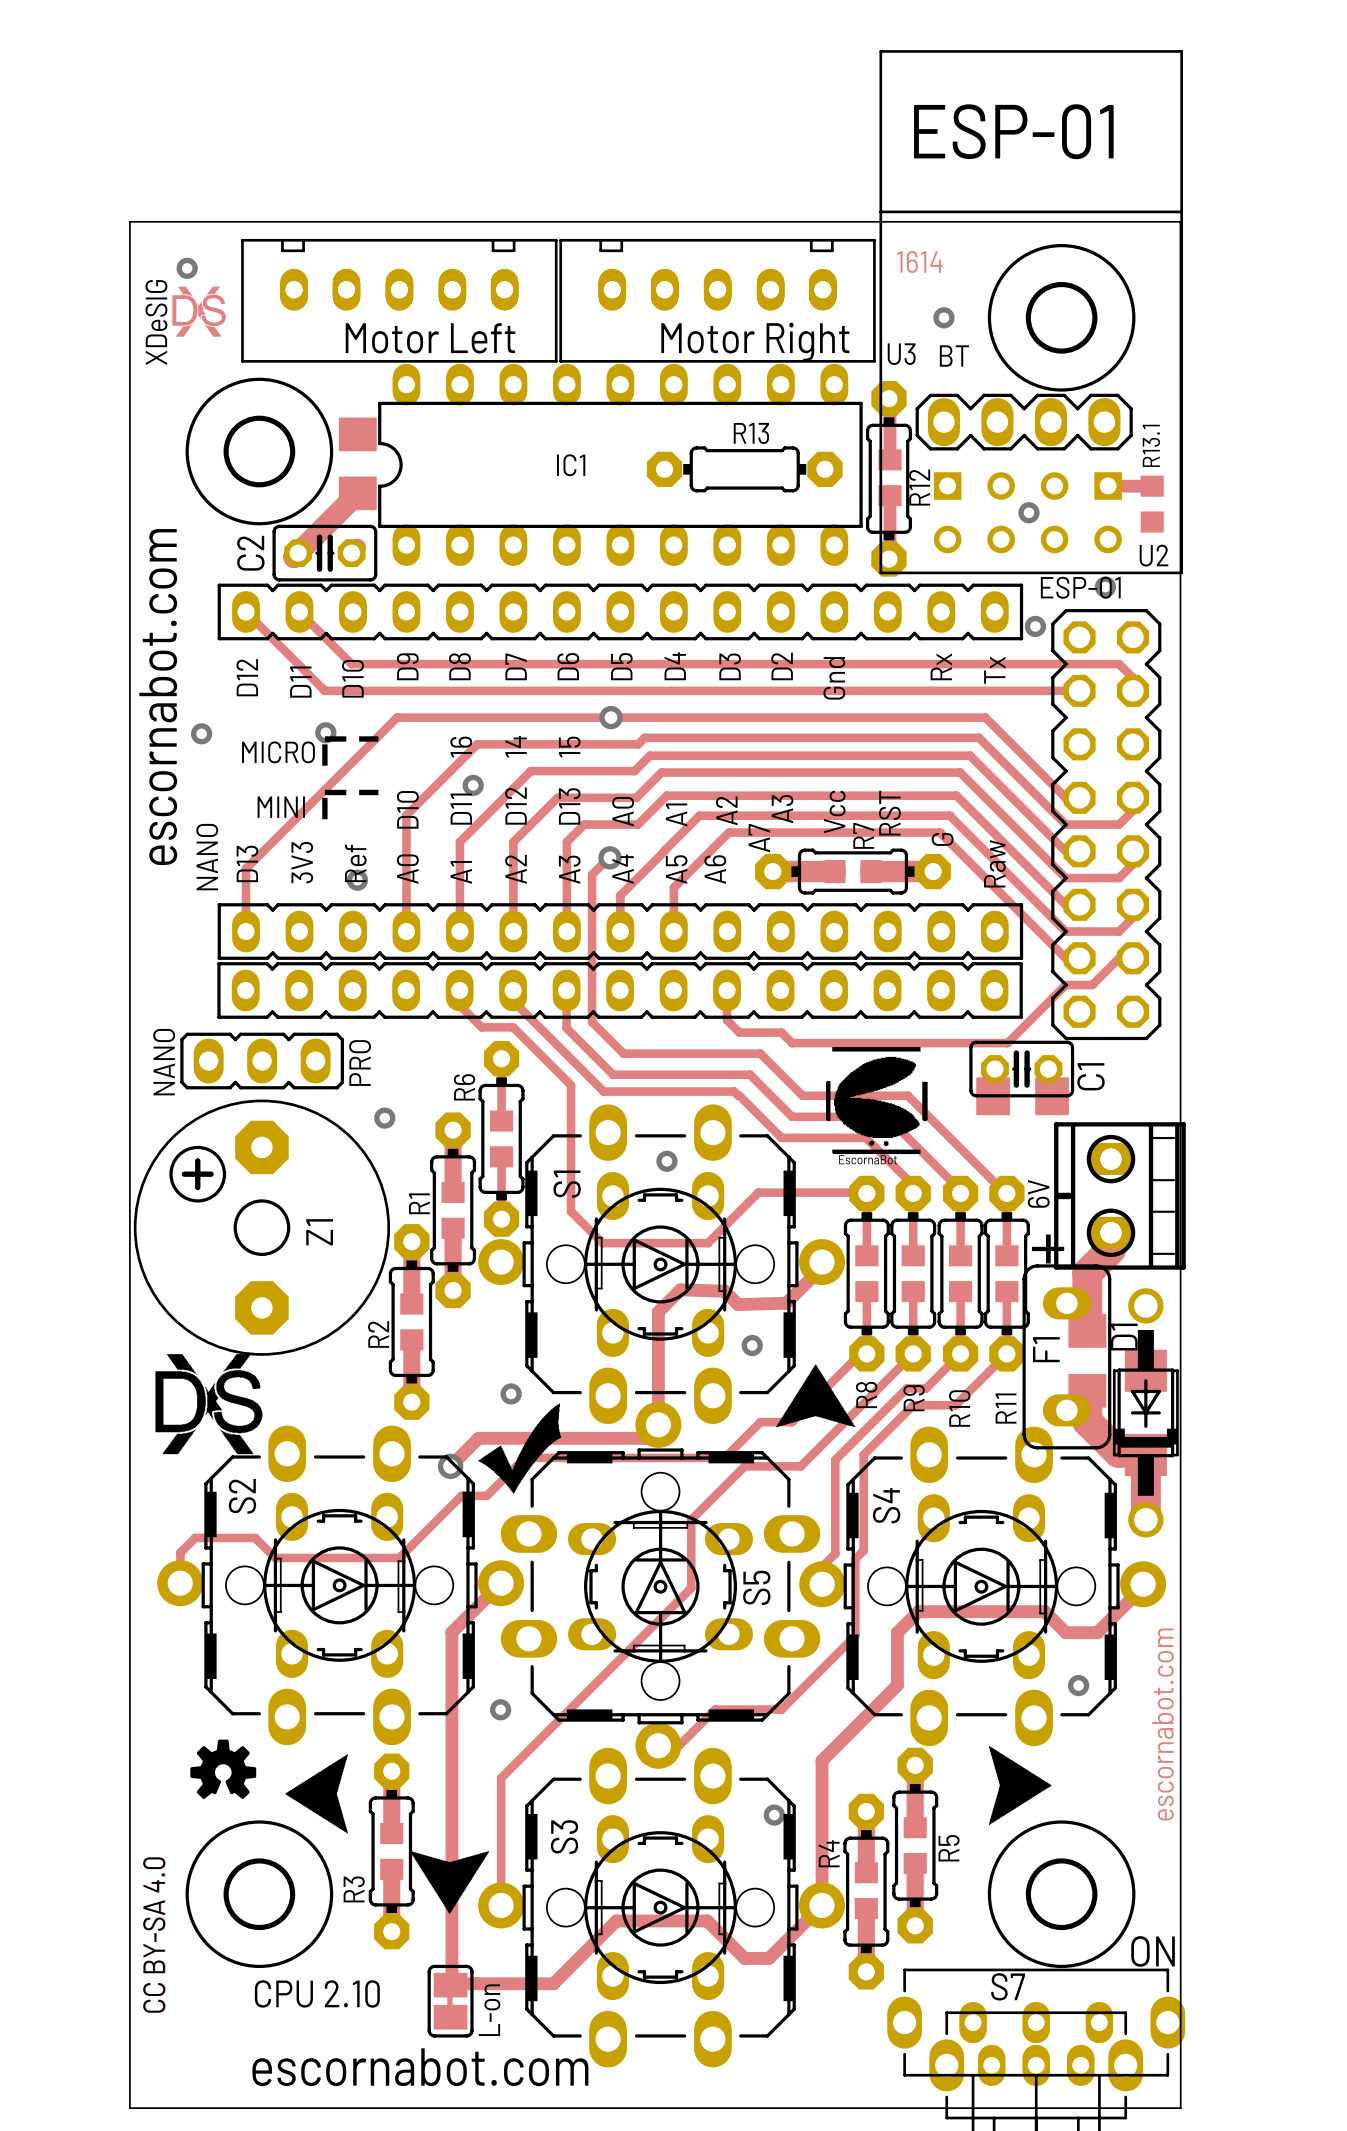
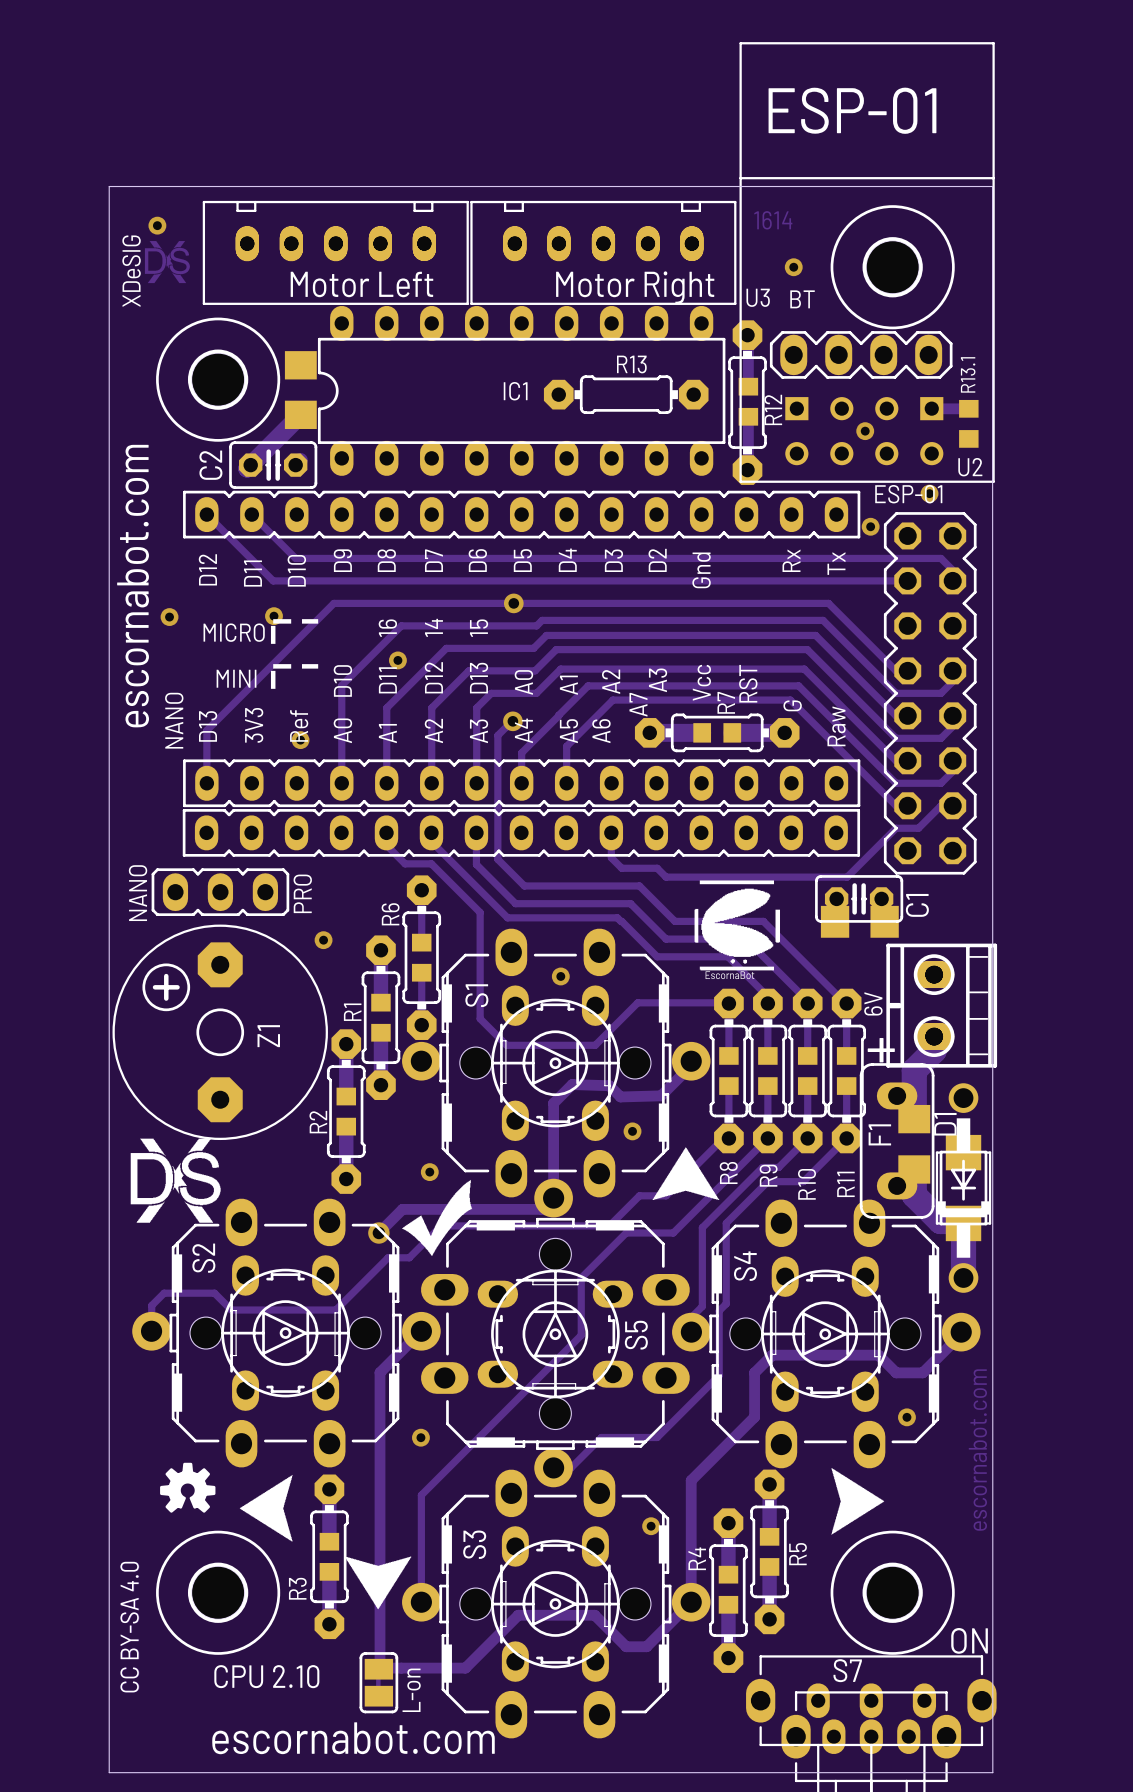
IC1 name position: IC1 (571, 465) -> IC1 (515, 391)

